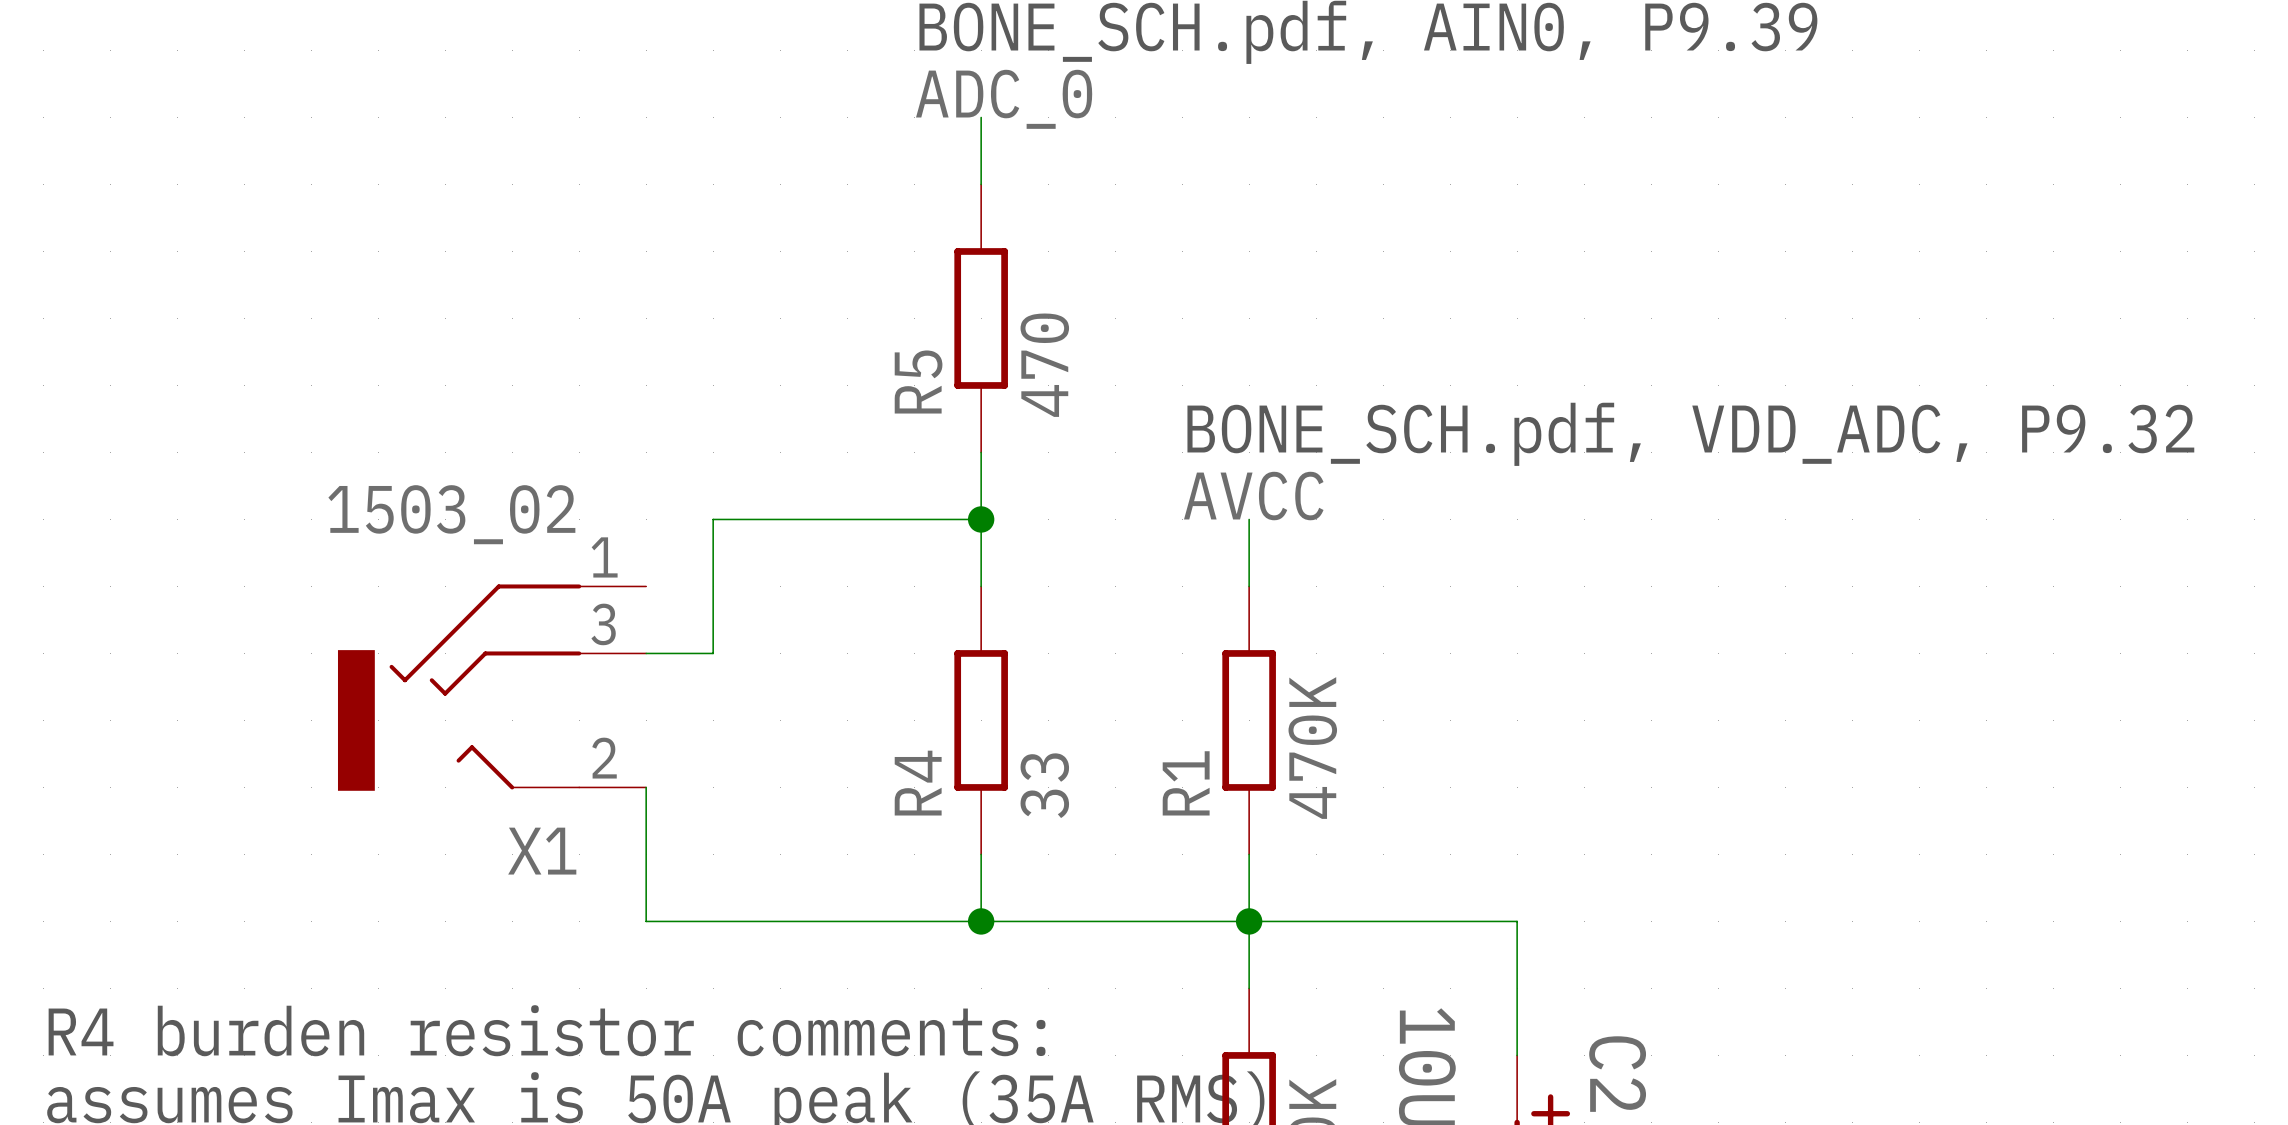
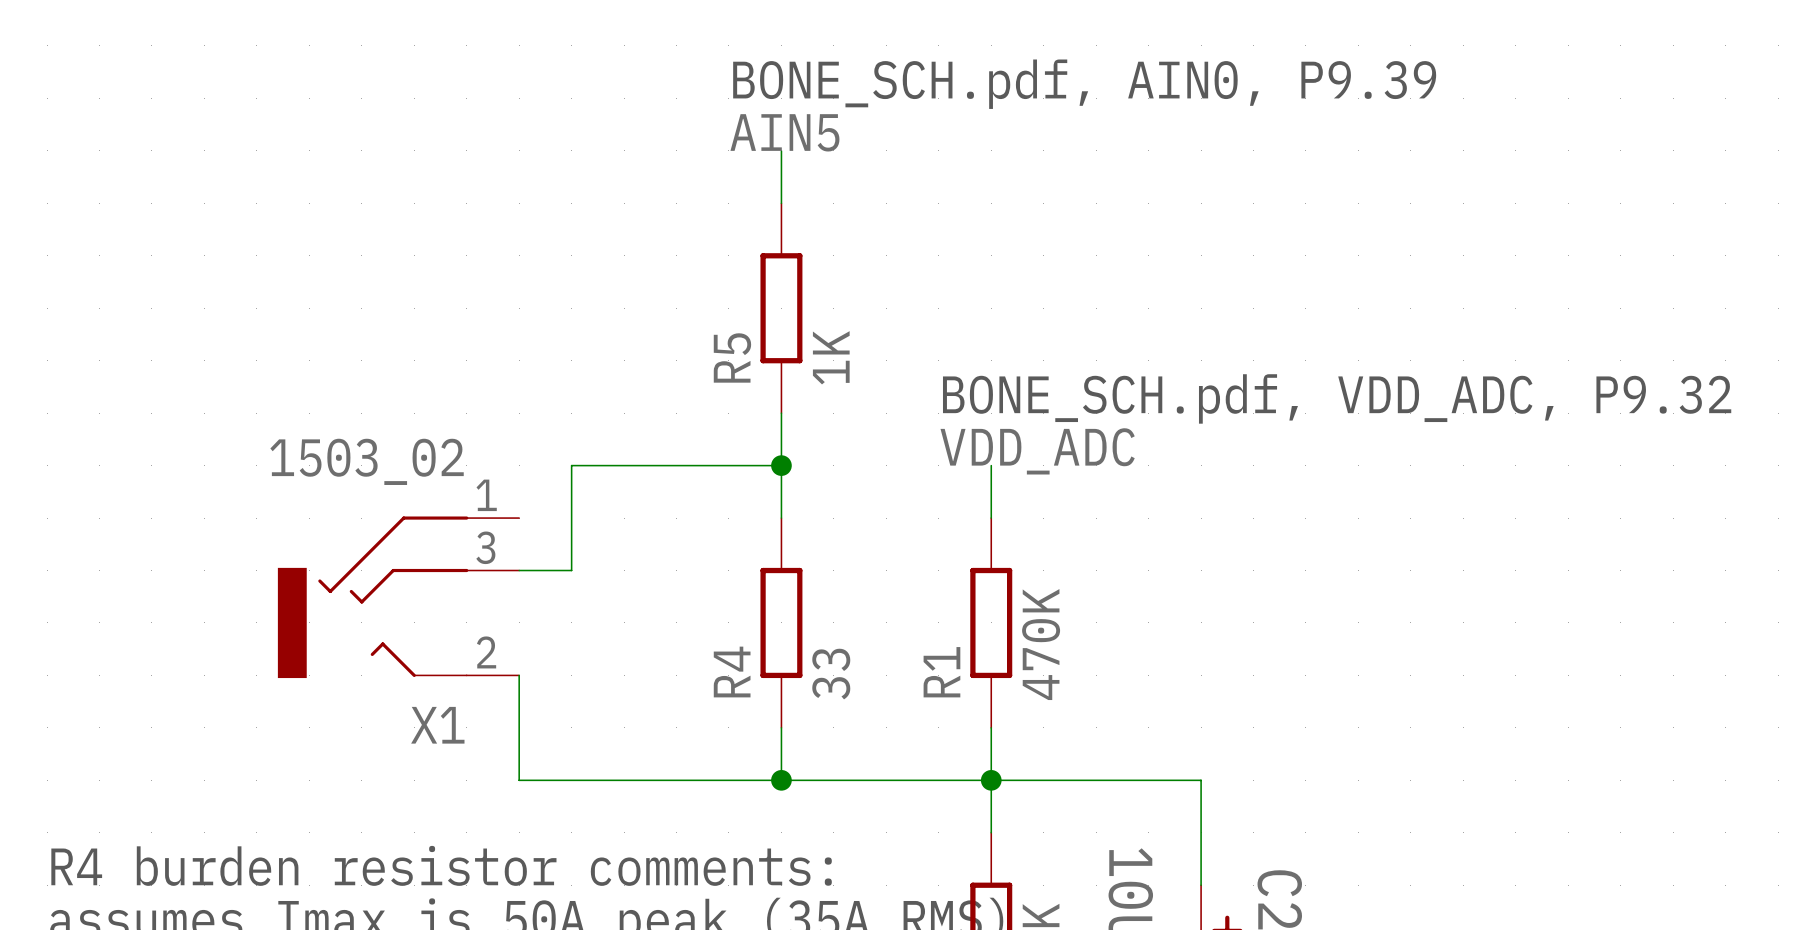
label: ADC_0 (1004, 99) -> AIN5 (784, 132)
R5 value: 470 (1044, 365) -> 1K (831, 357)
label: AVCC (1253, 496) -> VDD_ADC (1037, 451)

